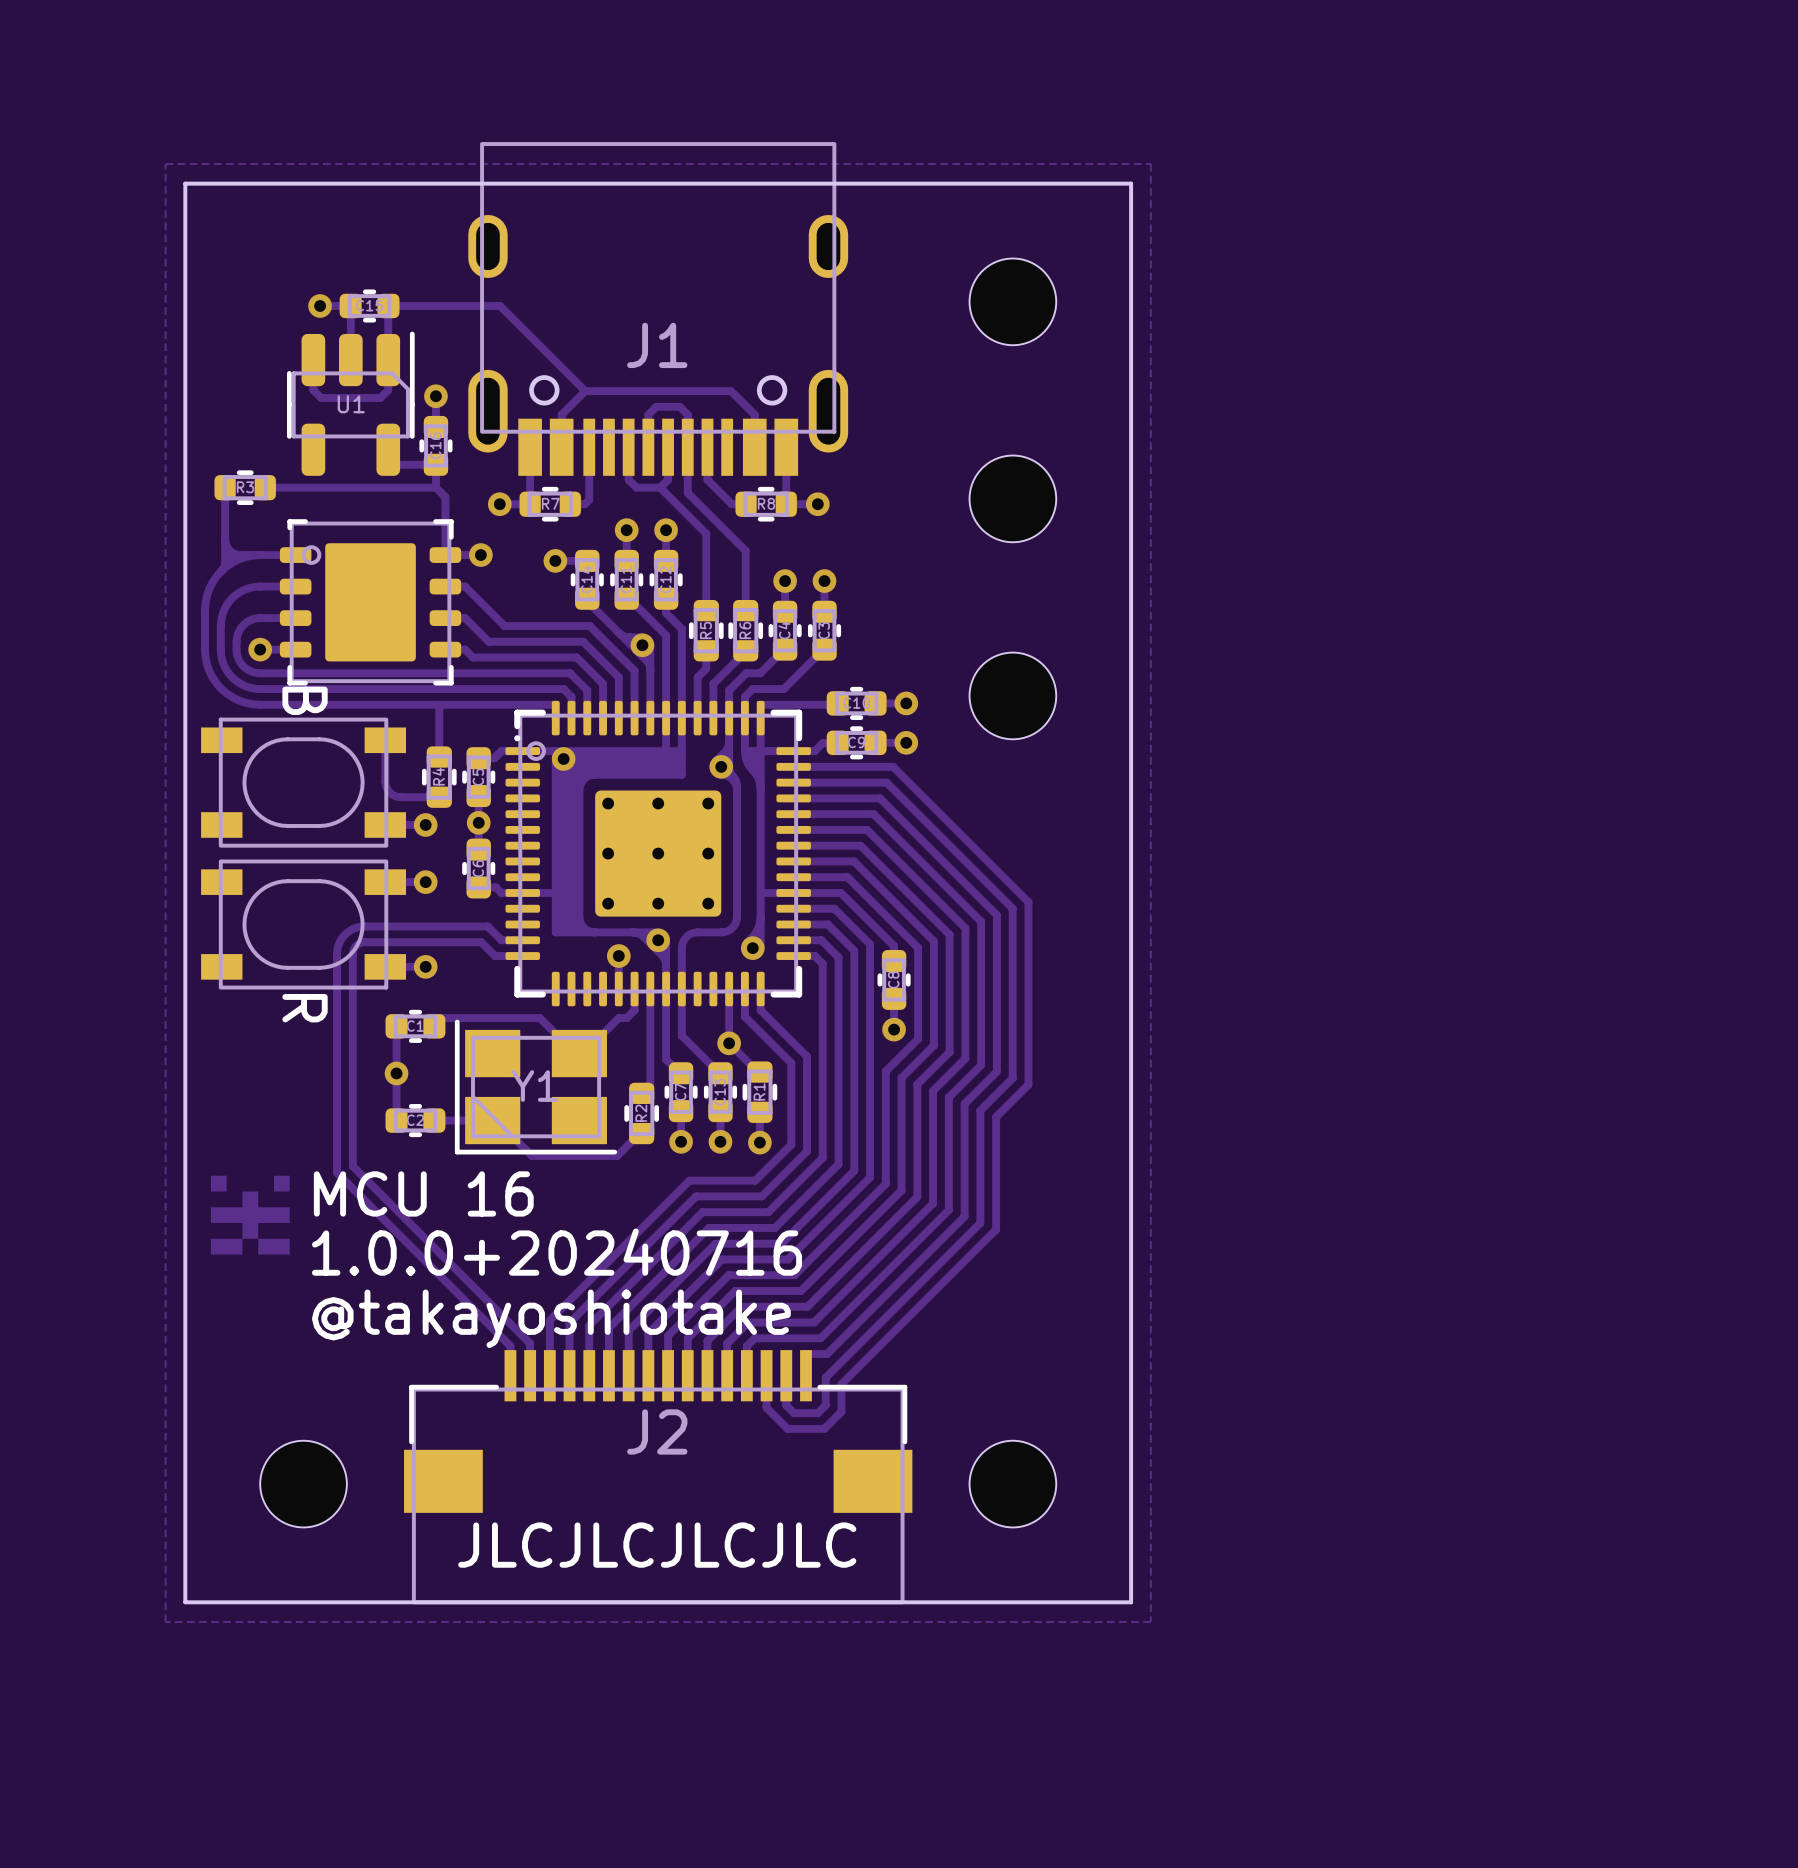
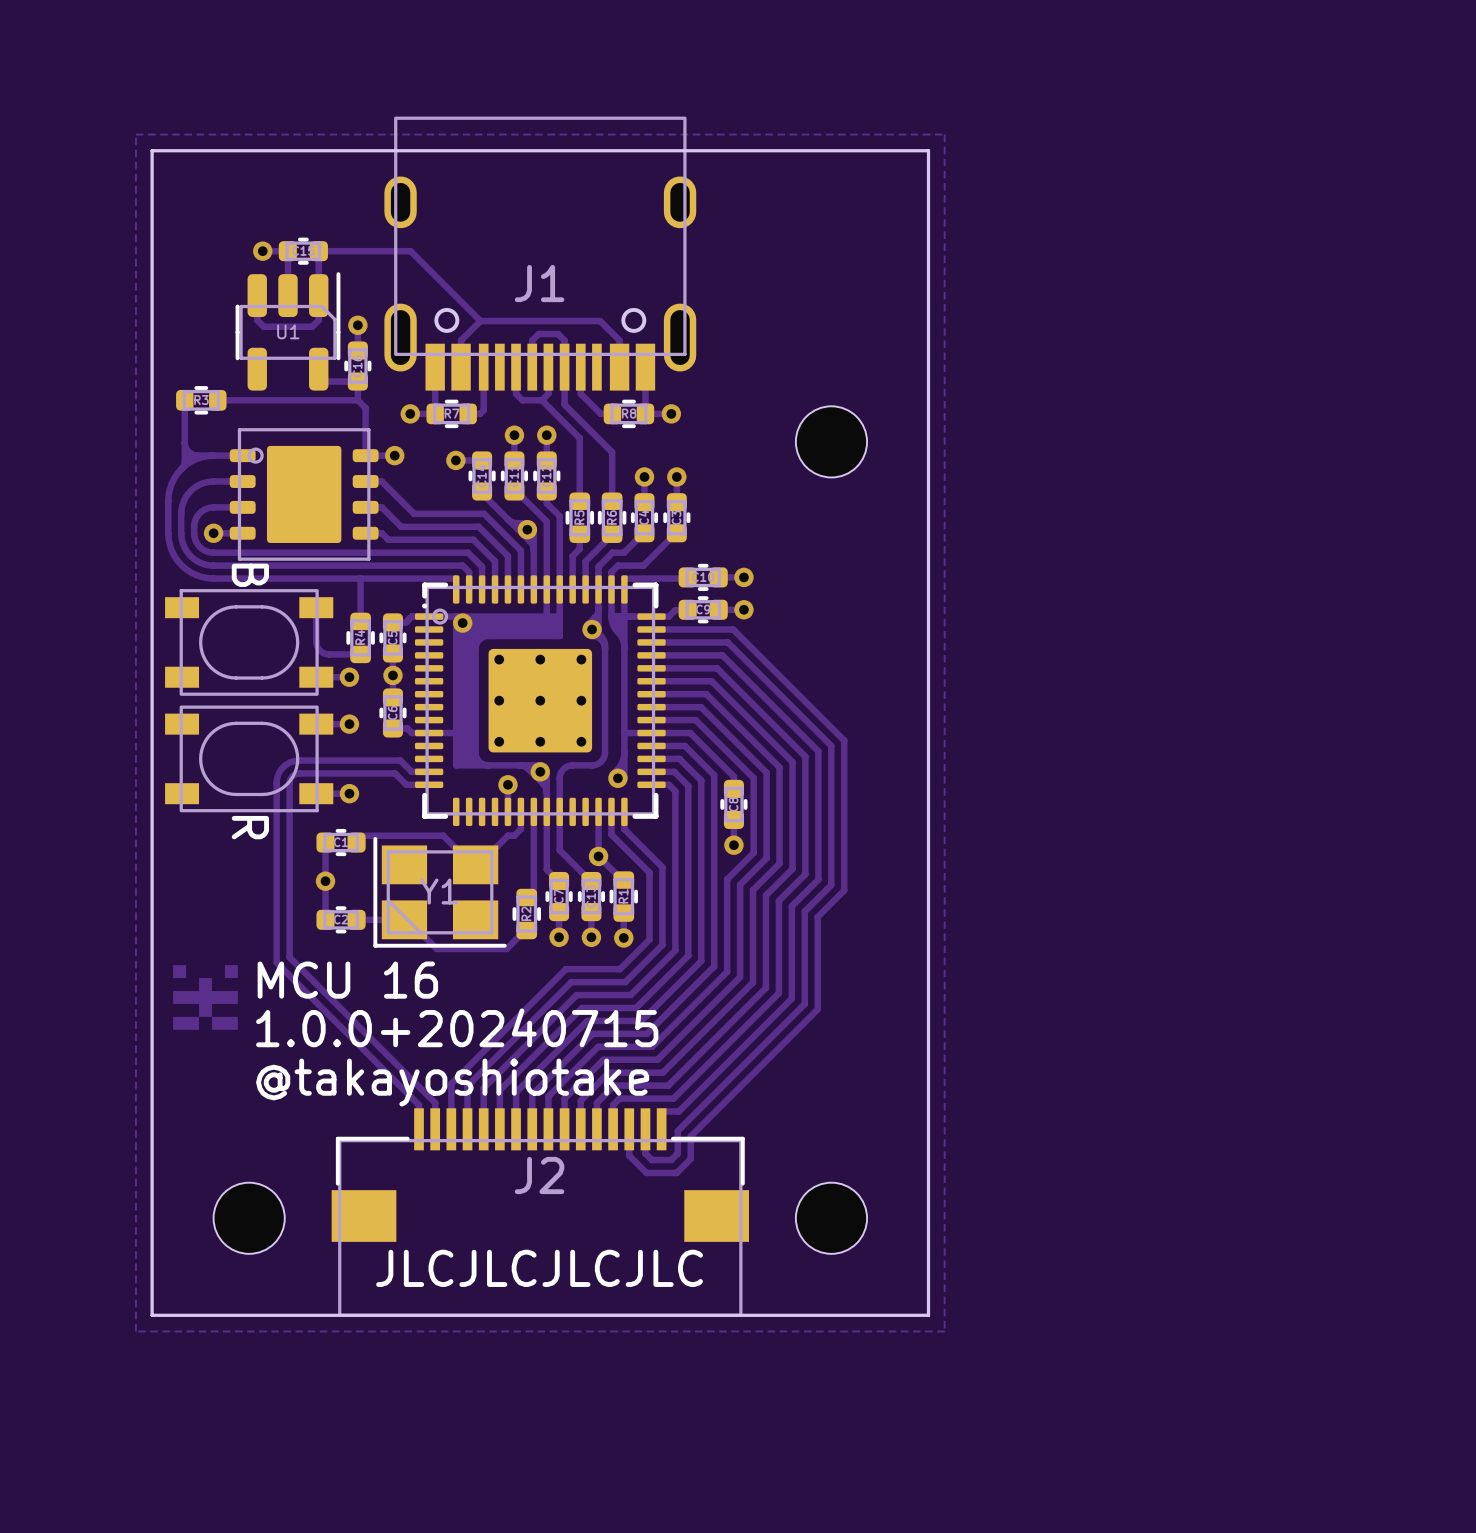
part: (1012, 301) -> none
part position: (1012, 498) -> (831, 441)
part footprint: [279, 519, 462, 686] -> [229, 428, 379, 561]
part: (1012, 695) -> none
text: 1.0.0+20240716 (557, 1252) -> 1.0.0+20240715 (457, 1027)

